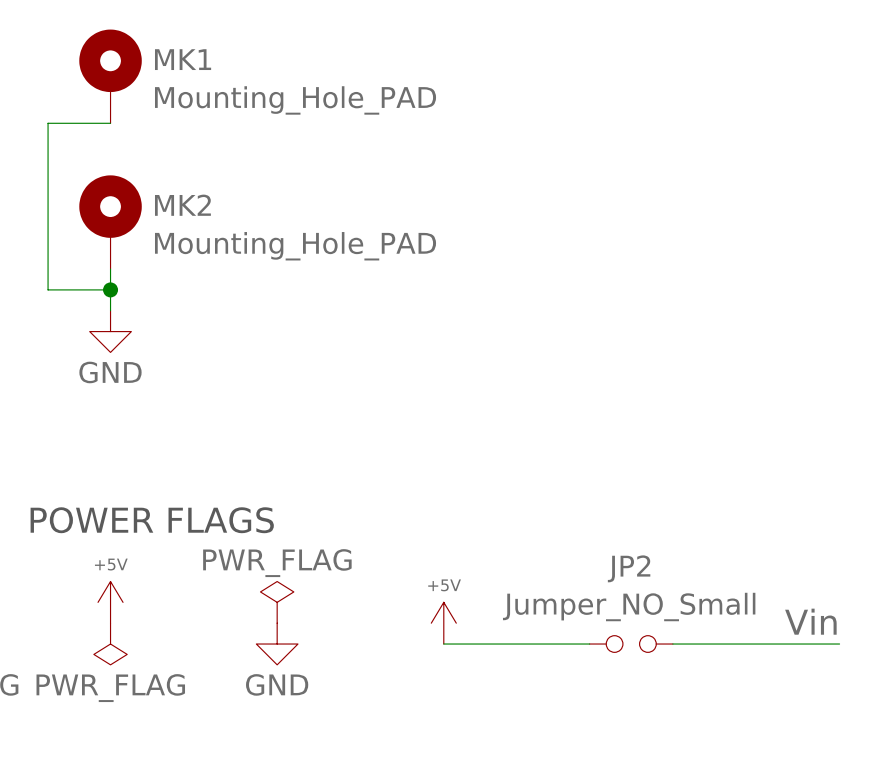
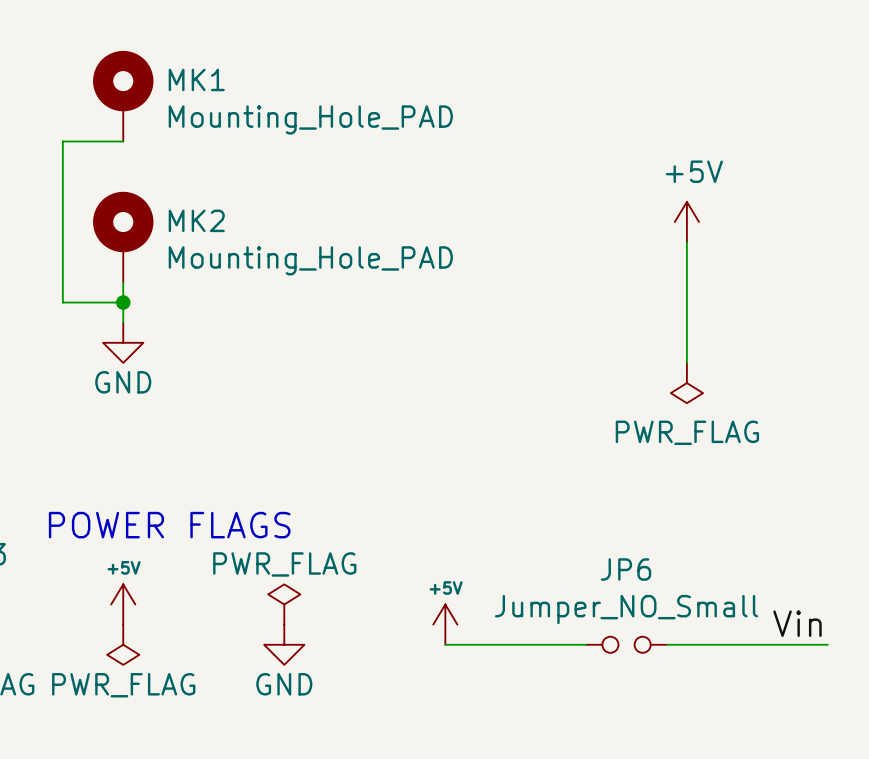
power symbol: none -> +5V (686, 222)
wire: none -> (686, 242) (686, 362)
power symbol: none -> PWR_FLAG (686, 383)
JP2 name: JP2 (629, 568) -> JP6 (626, 569)

